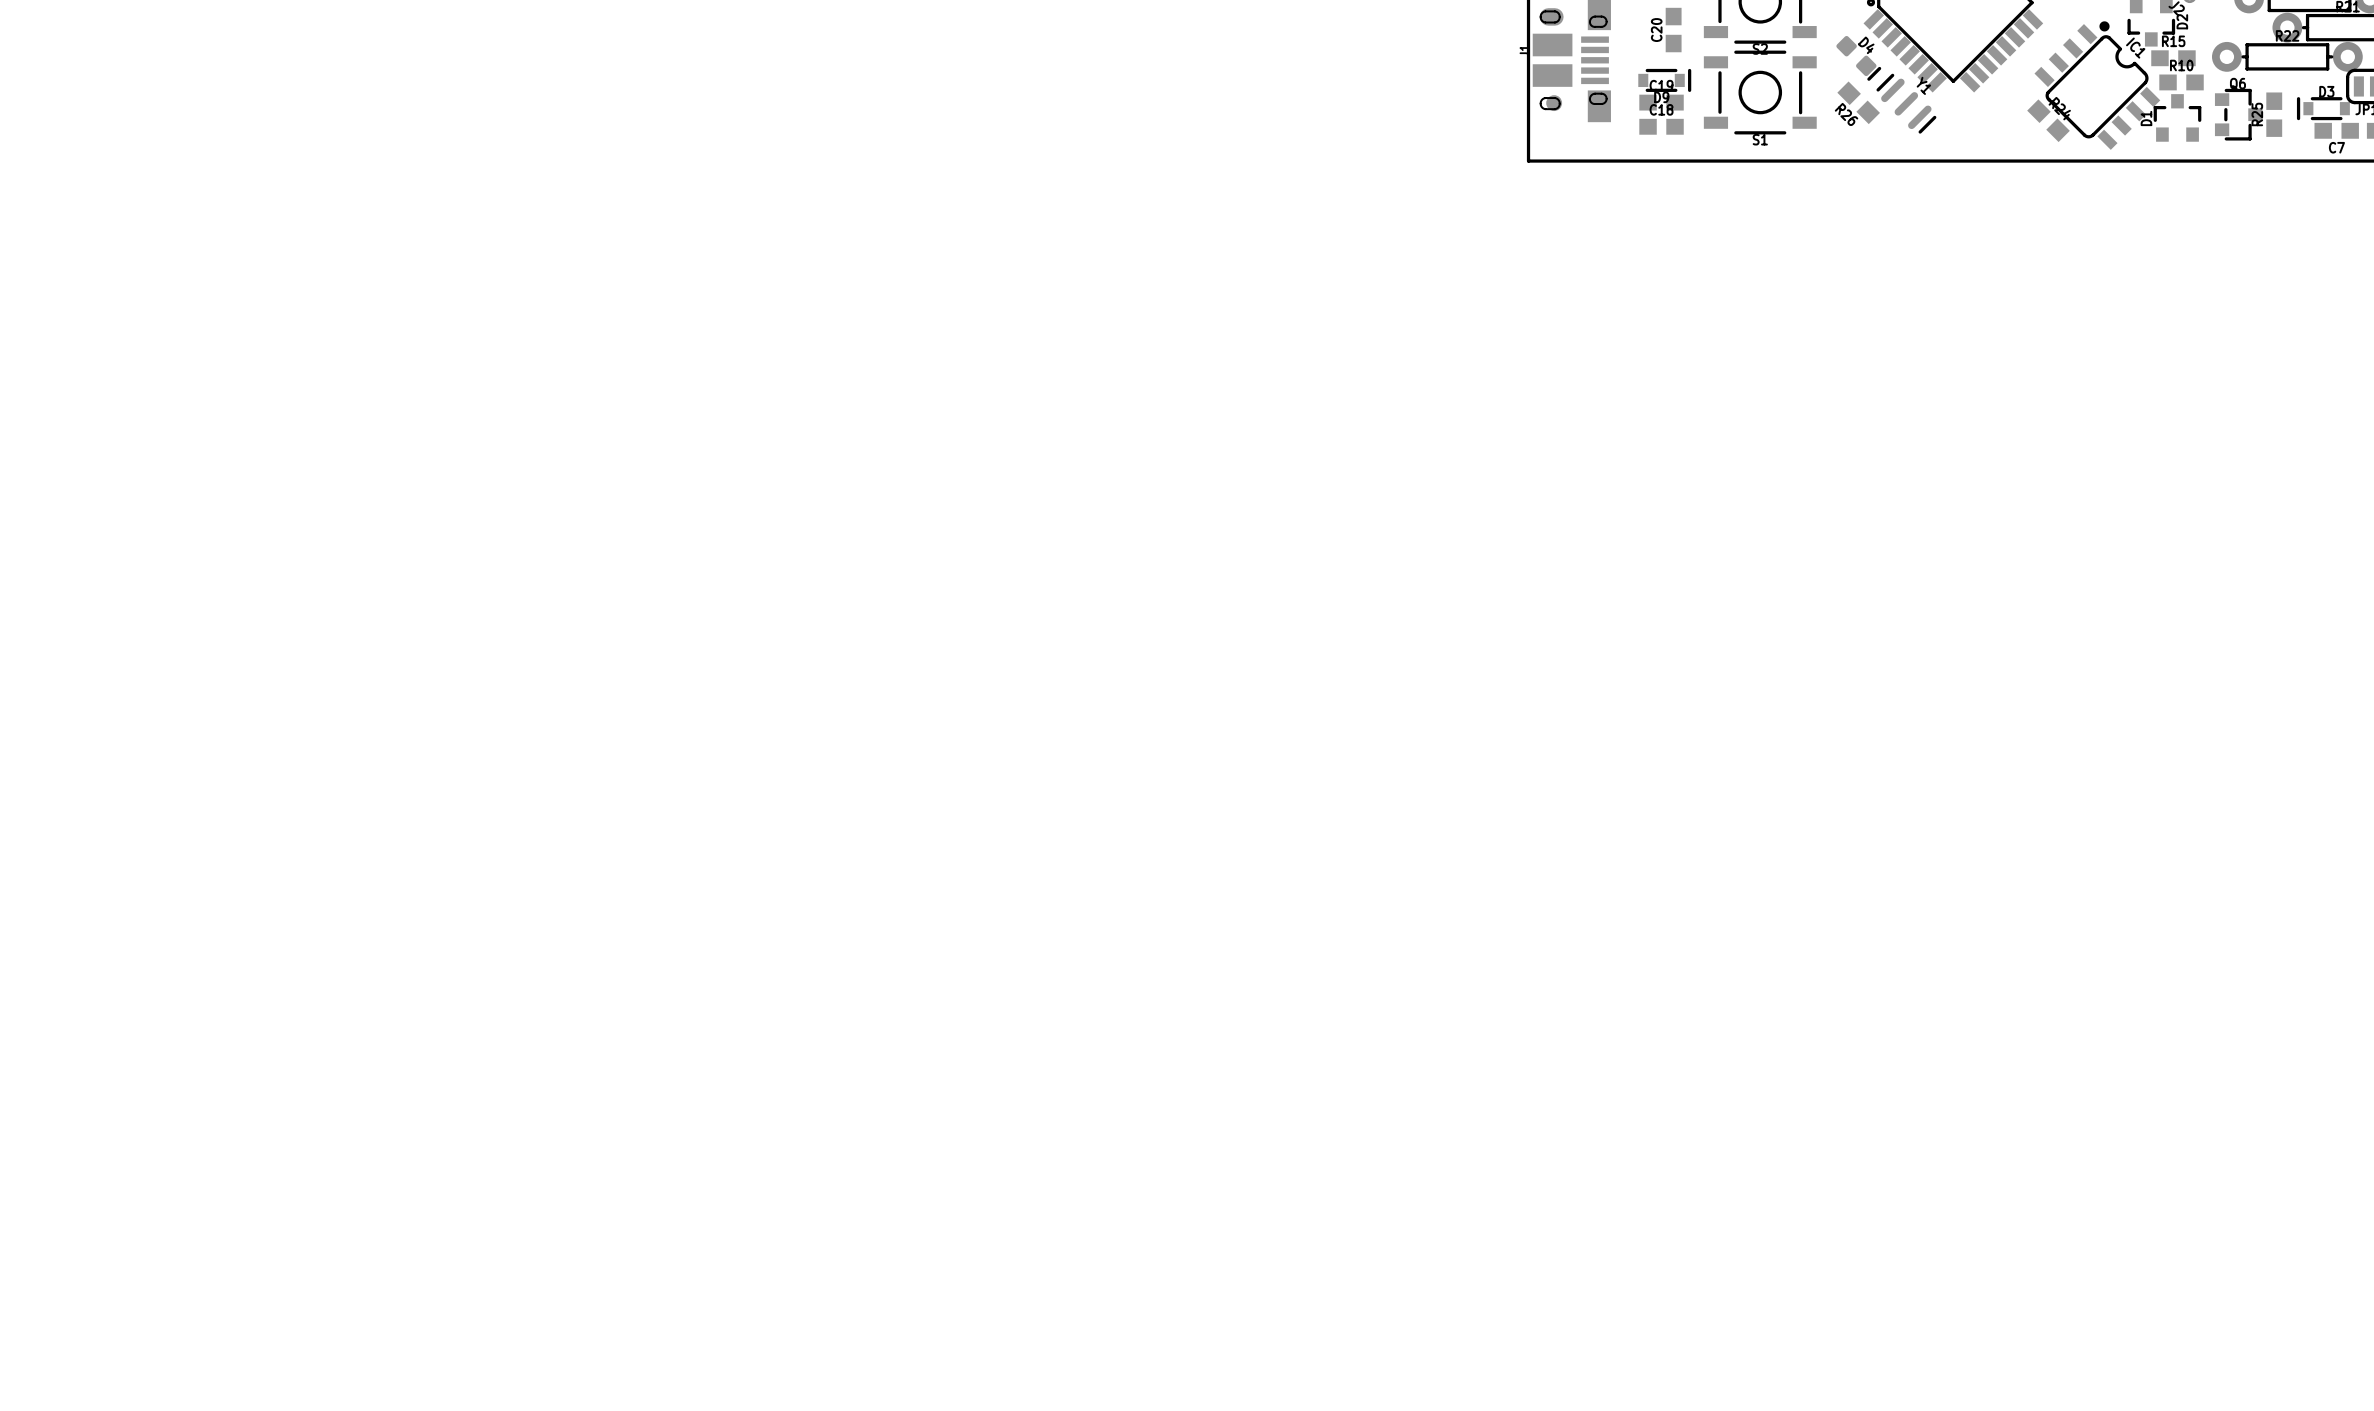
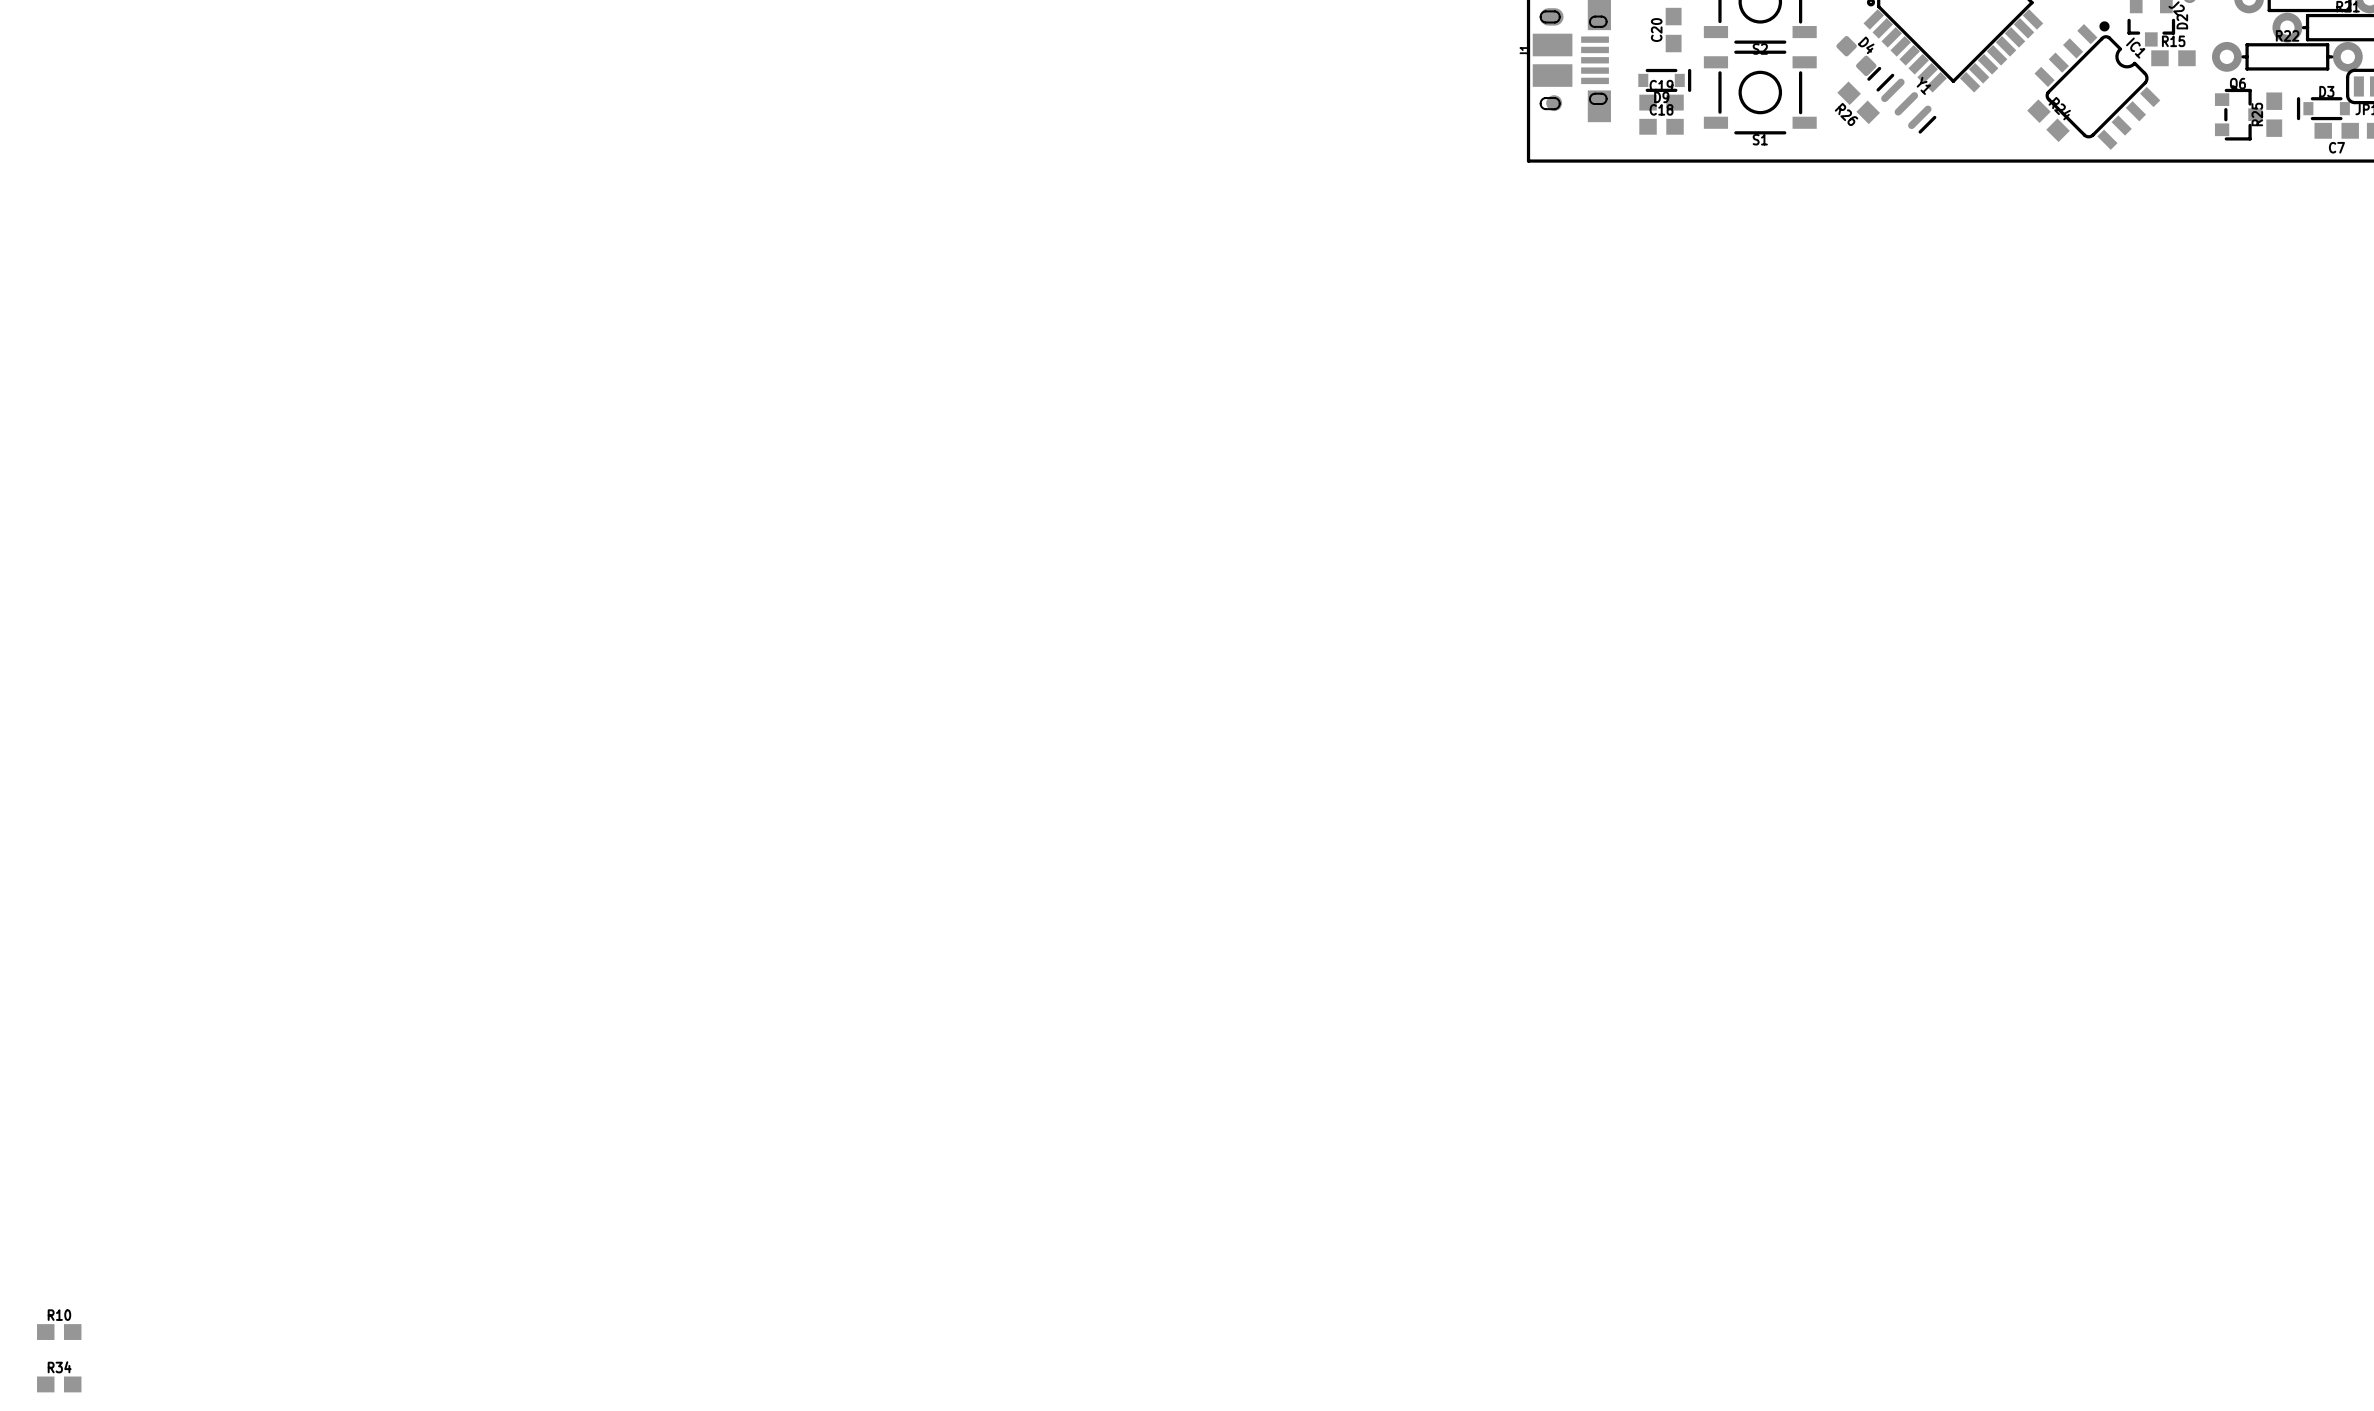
R10 position: (2181, 82) -> (59, 1332)
D1: (2177, 117) -> none
R34: none -> (59, 1384)

